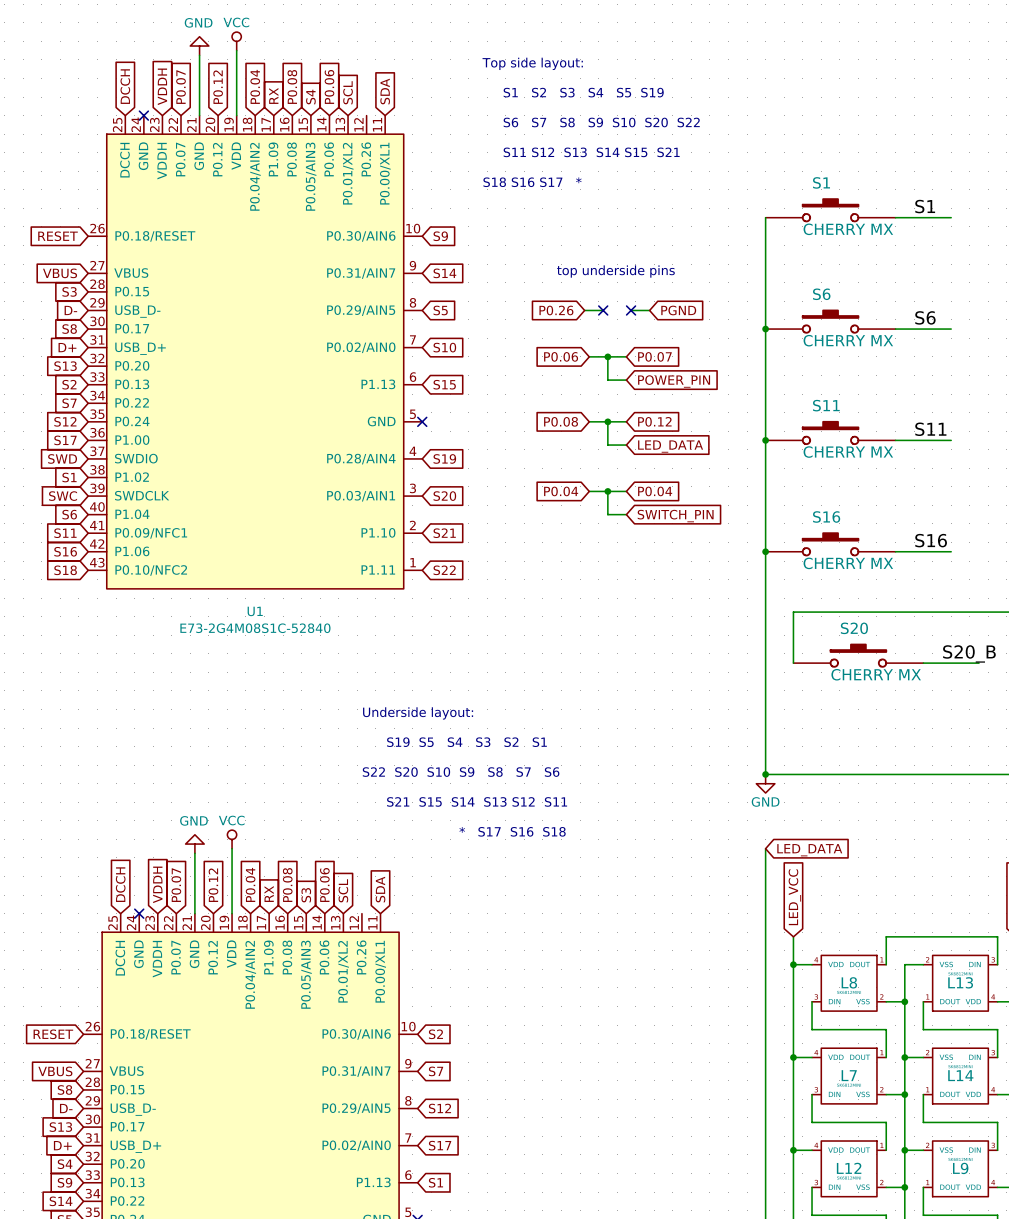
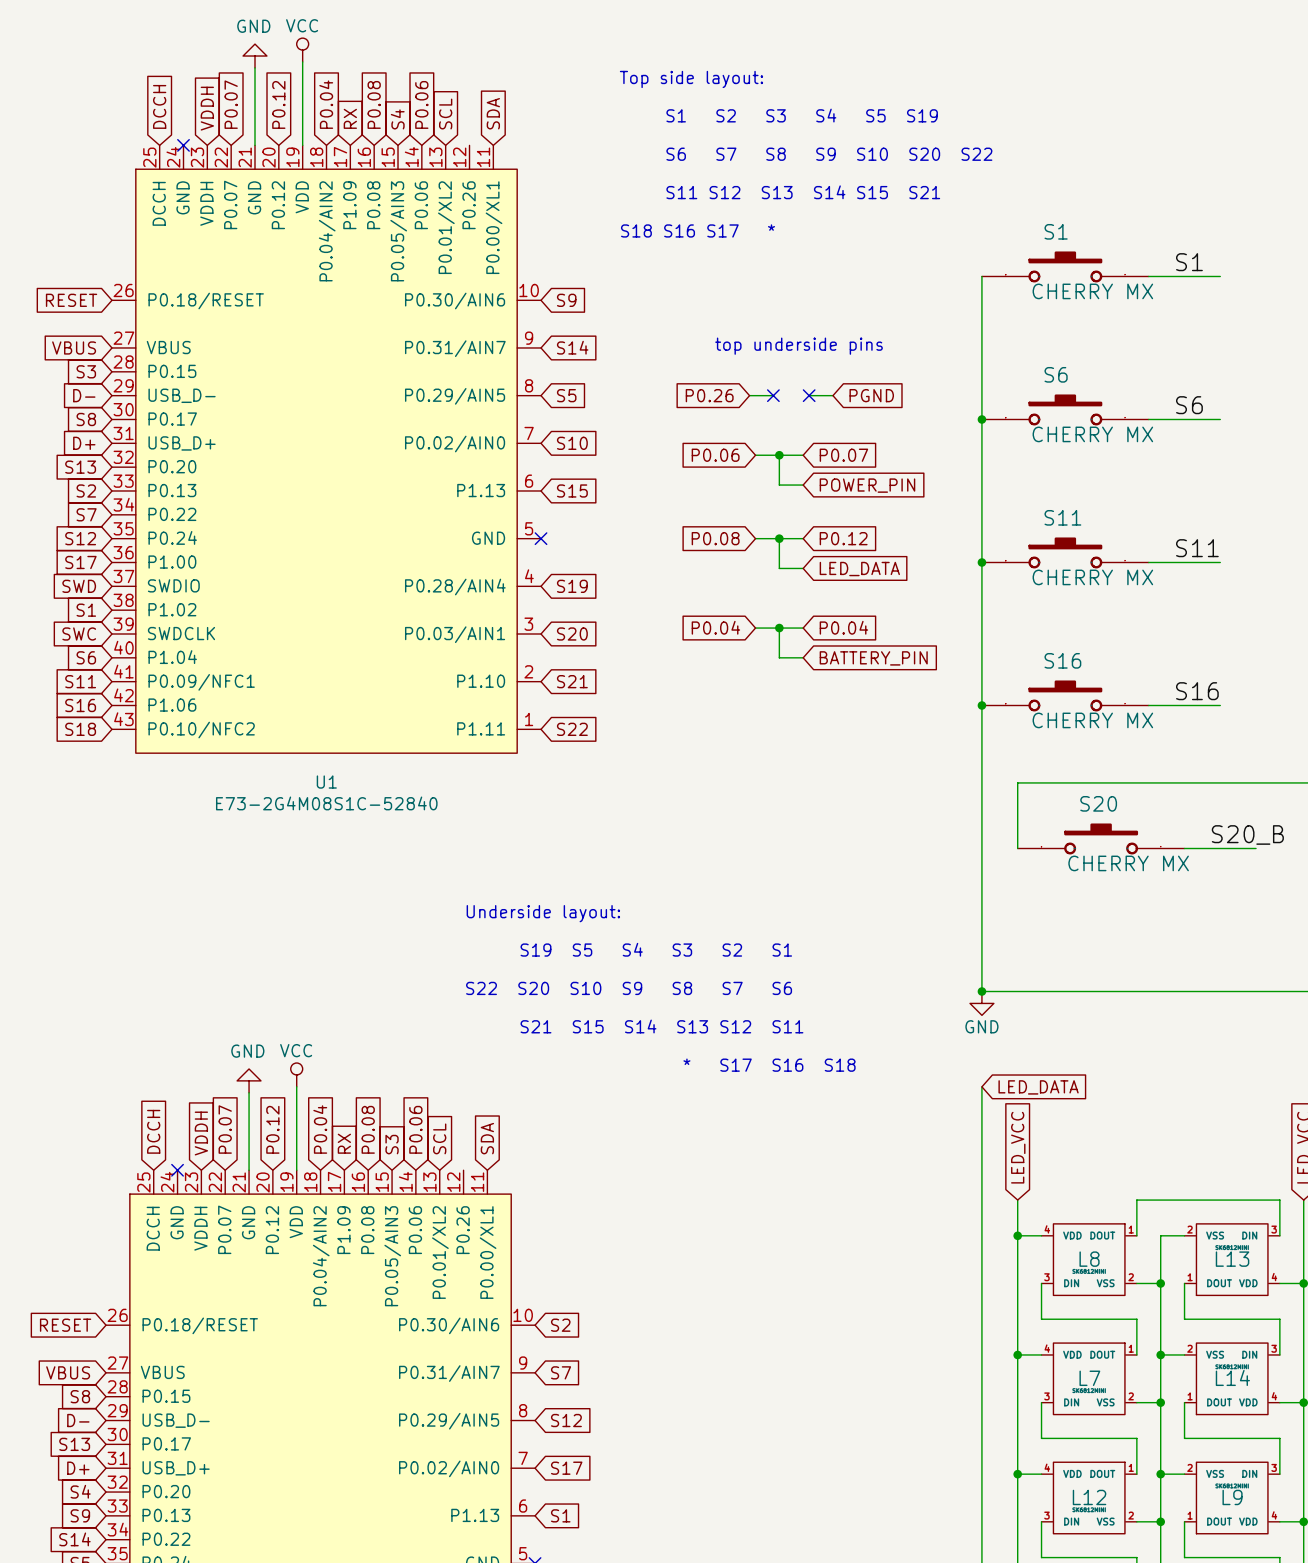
global label: SWITCH_PIN (675, 516) -> BATTERY_PIN (873, 658)

